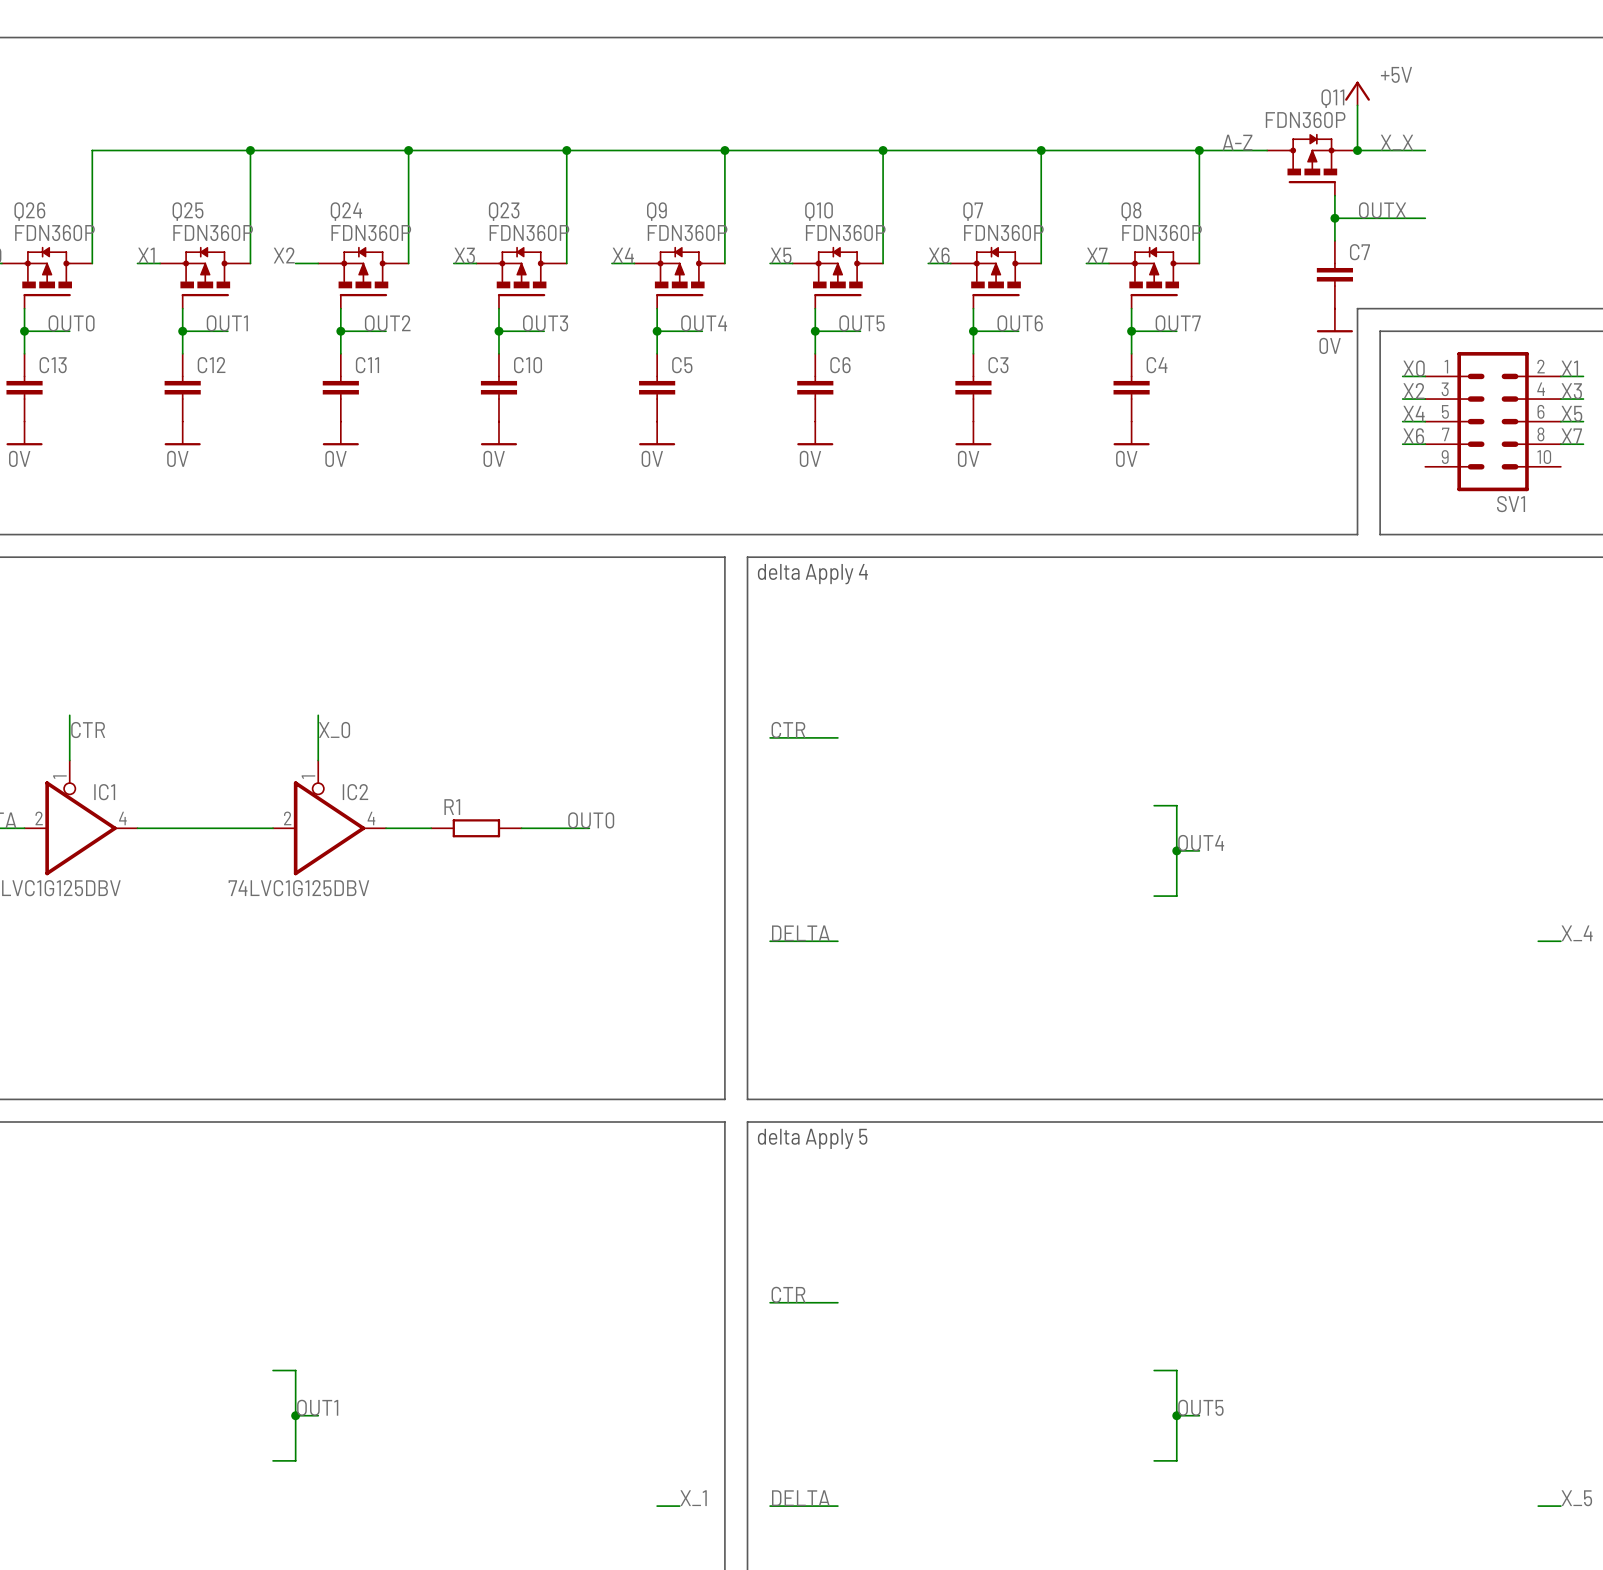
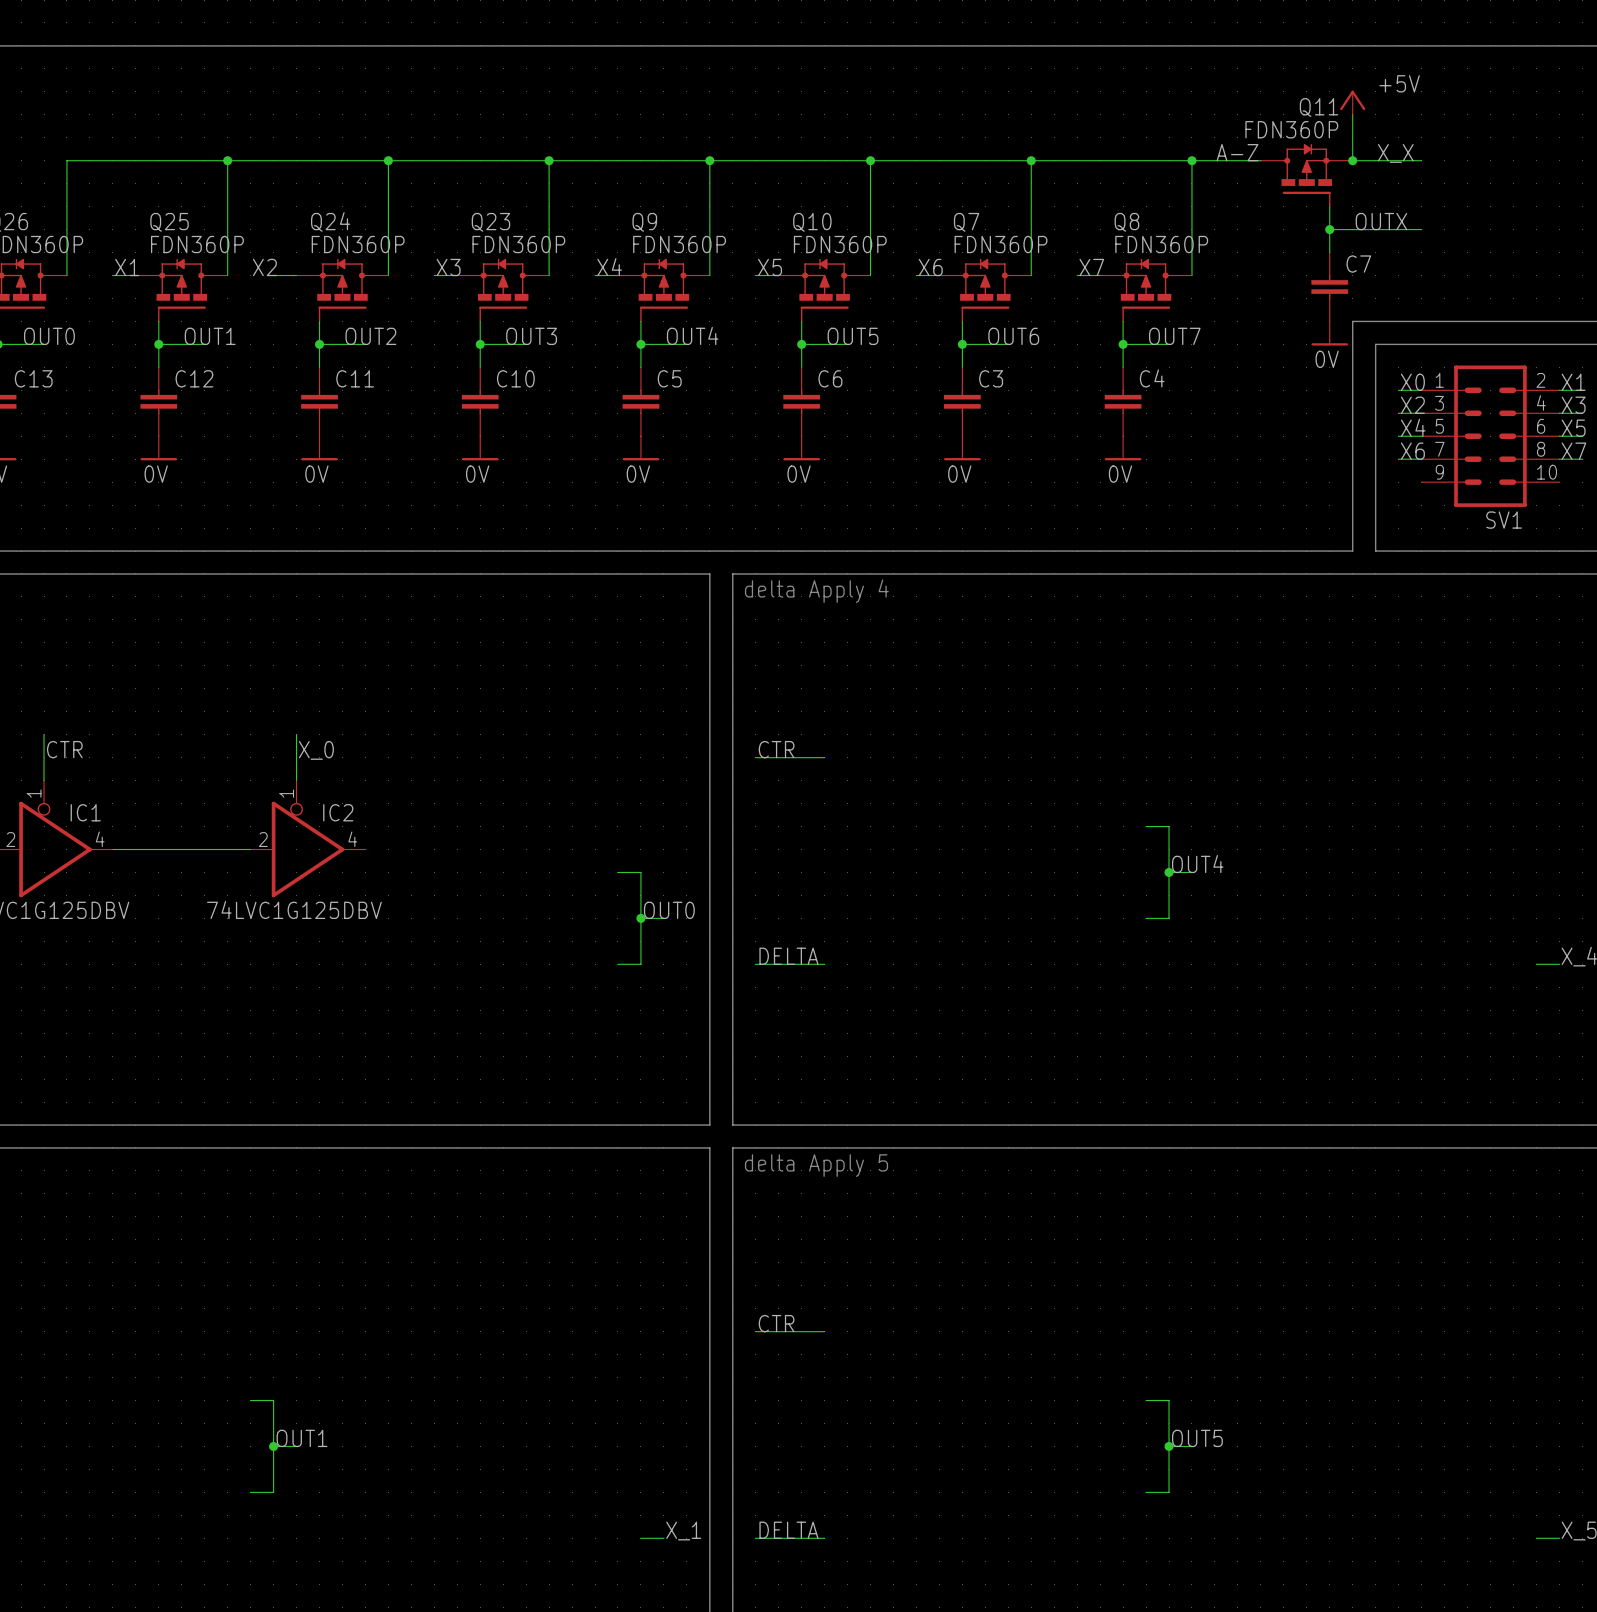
label position: OUT0 (591, 820) -> OUT0 (669, 910)
wire: (386, 828) (431, 828) -> none
R1: (476, 828) -> none
wire: (521, 828) (589, 828) -> none
wire: none -> (617, 872) (640, 872) (640, 964) (617, 964)
wire: none -> (640, 918) (663, 918)
junction: none -> (640, 918)

